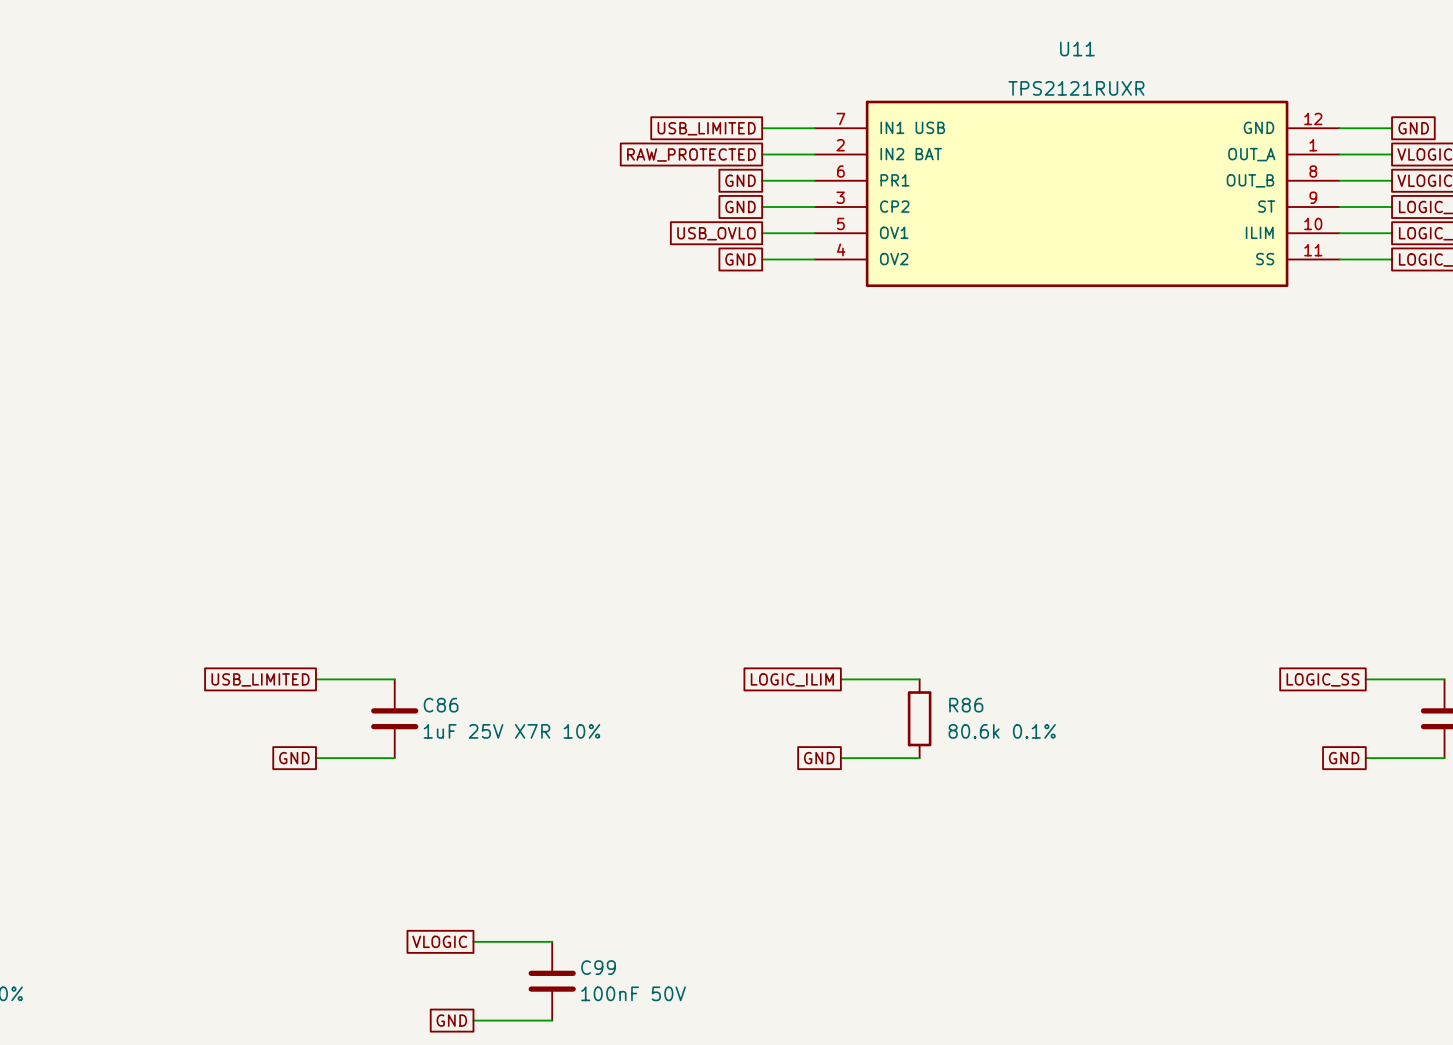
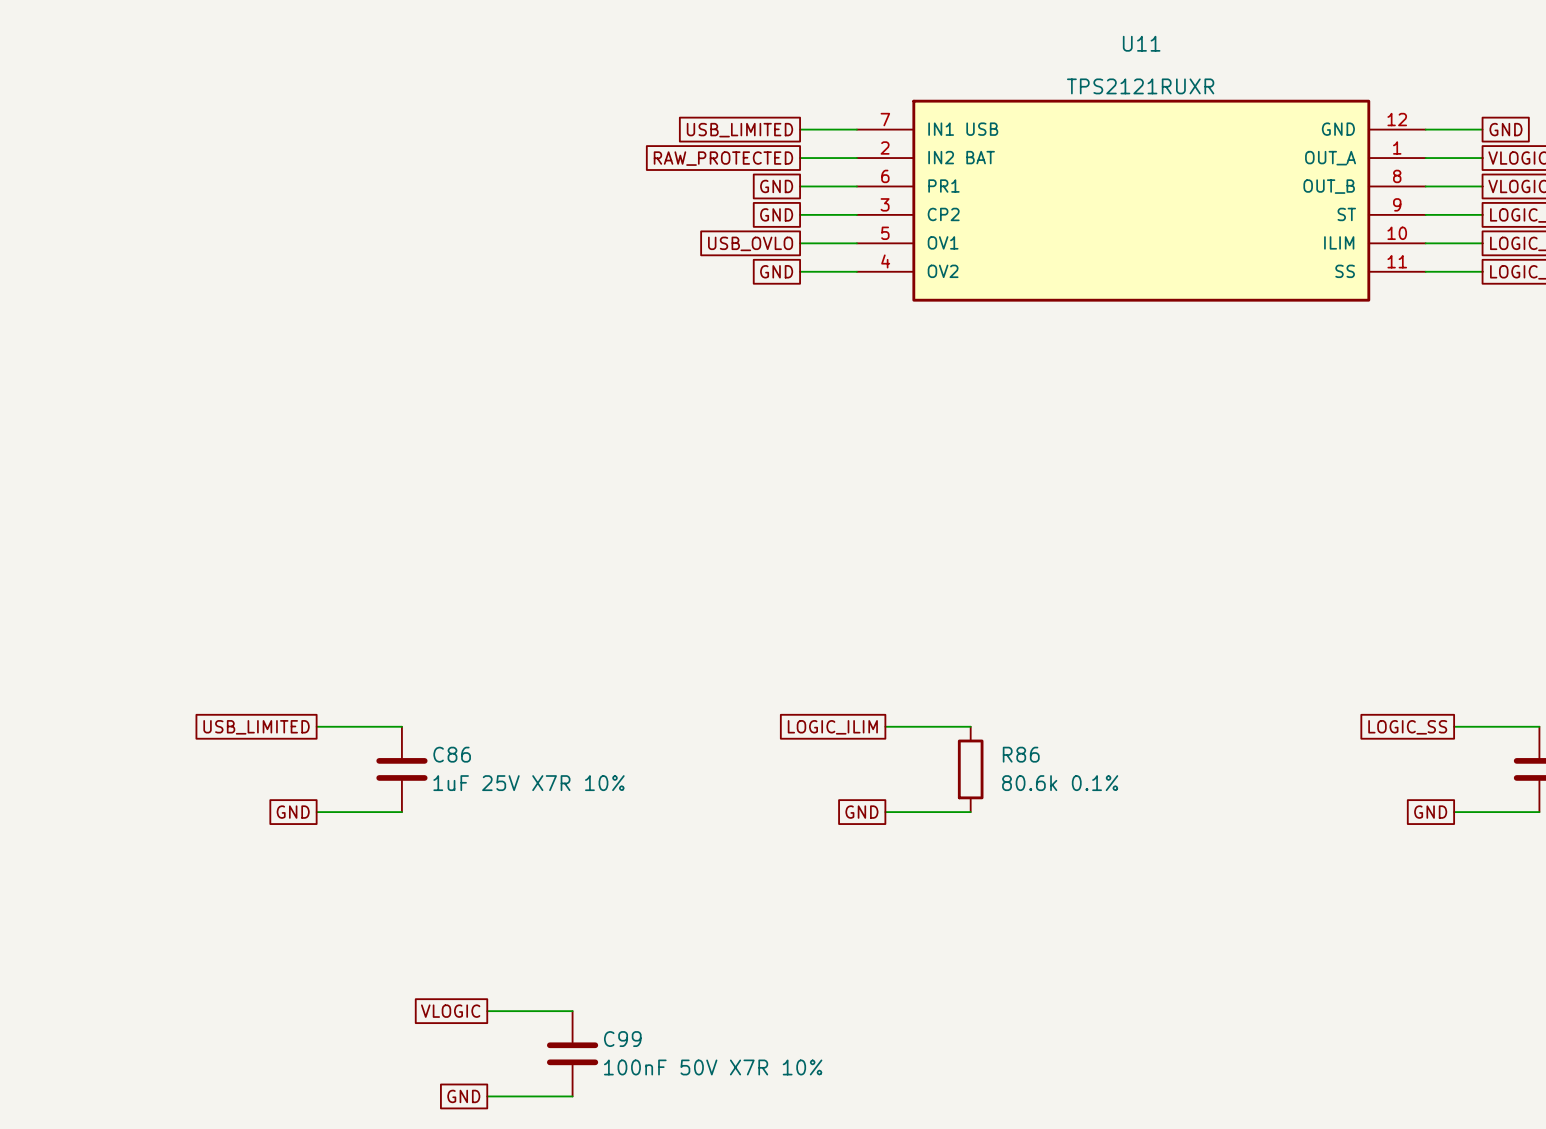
C99 value: 100nF 50V (633, 993) -> 100nF 50V X7R 10% (713, 1067)

